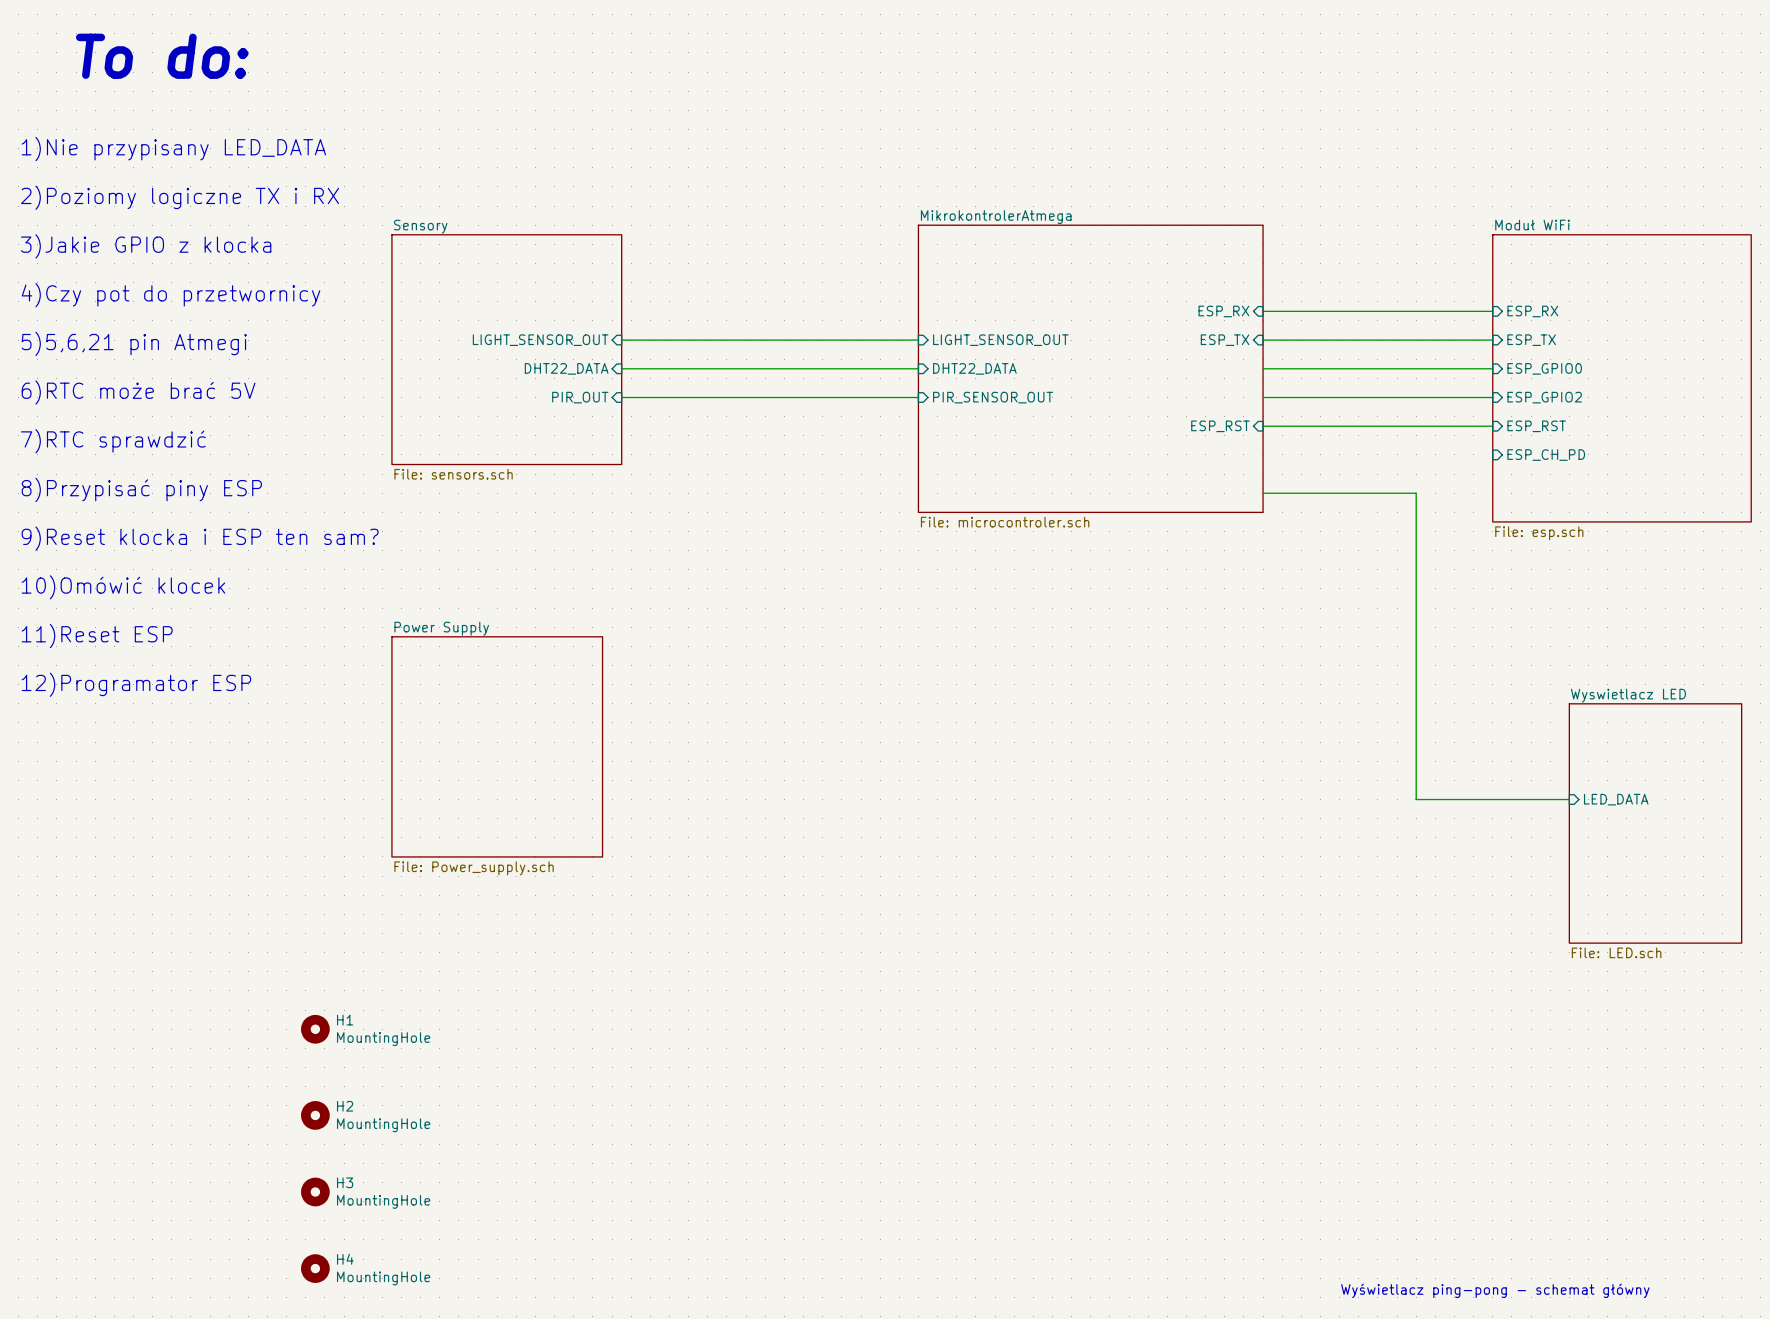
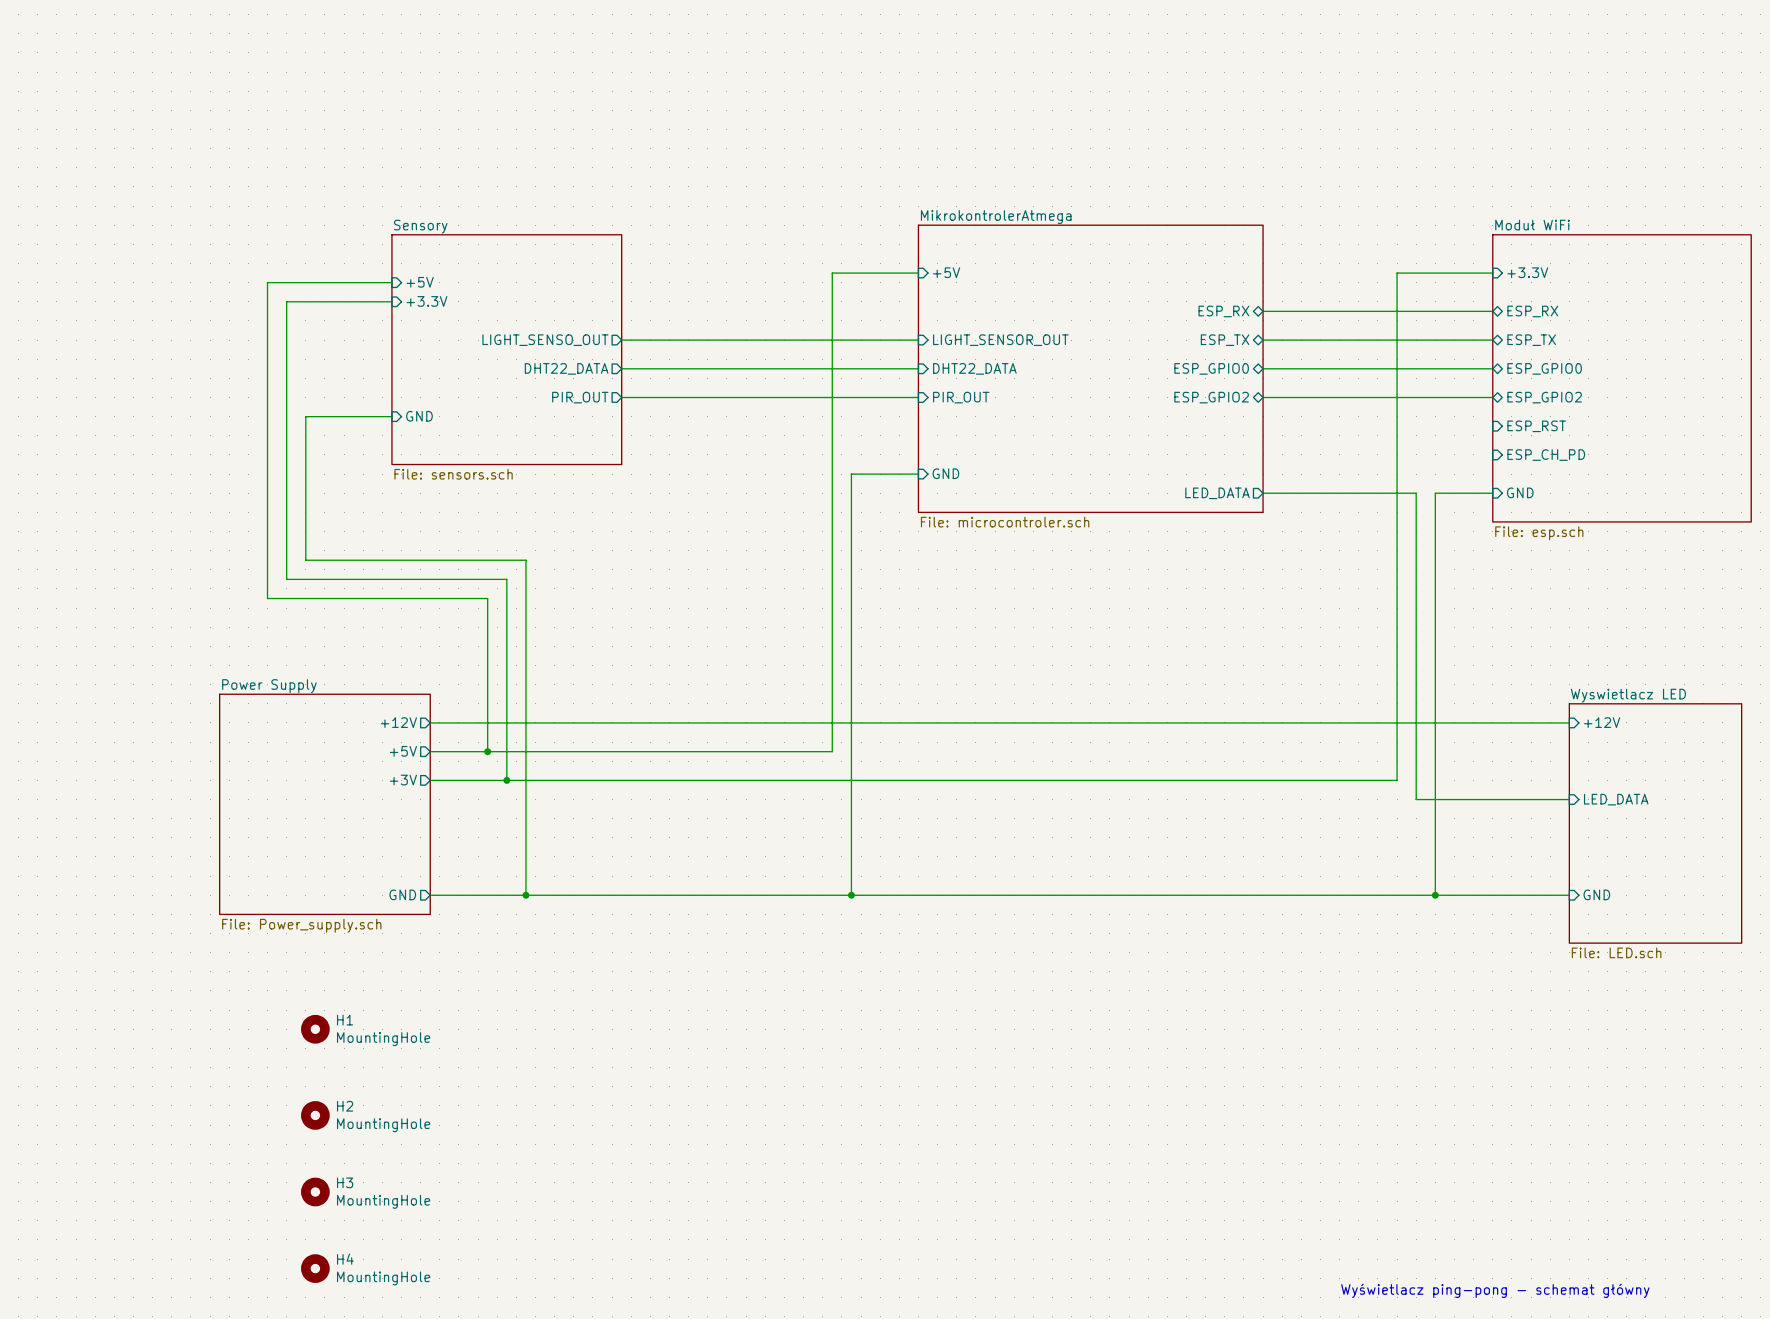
text: To do: (162, 56) -> none
text: 1)Nie przypisany LED_DATA (173, 149) -> none
text: 2)Poziomy logiczne TX i RX (179, 197) -> none
text: 3)Jakie GPIO z klocka (146, 246) -> none
sheet pin: none -> +5V (946, 272)
sheet pin: none -> +3.3V (1527, 272)
wire: none -> (918, 273) (832, 273) (832, 751) (430, 751)
wire: none -> (1492, 273) (1397, 273) (1397, 780) (430, 780)
wire: none -> (391, 282) (267, 282) (267, 598) (487, 598) (487, 751)
sheet pin: none -> +5V (420, 282)
text: 4)Czy pot do przetwornicy (170, 295) -> none
wire: none -> (391, 301) (286, 301) (286, 579) (506, 579) (506, 780)
sheet pin: none -> +3.3V (426, 301)
sheet pin shape: input (1223, 311) -> bidirectional (1223, 311)
sheet pin shape: input (1532, 311) -> bidirectional (1532, 311)
sheet pin shape: input (540, 340) -> output (545, 340)
sheet pin: LIGHT_SENSOR_OUT (540, 340) -> LIGHT_SENSO_OUT (545, 340)
sheet pin shape: input (1225, 340) -> bidirectional (1225, 340)
sheet pin shape: input (1531, 340) -> bidirectional (1531, 340)
text: 5)5,6,21 pin Atmegi (134, 343) -> none
sheet pin shape: input (566, 368) -> output (566, 368)
sheet pin: none -> ESP_GPIO0 (1211, 368)
sheet pin shape: input (1544, 368) -> bidirectional (1544, 368)
text: 6)RTC może brać 5V (138, 392) -> none
sheet pin shape: input (580, 397) -> output (580, 397)
sheet pin: PIR_SENSOR_OUT (993, 397) -> PIR_OUT (961, 397)
sheet pin: none -> ESP_GPIO2 (1211, 397)
sheet pin shape: input (1544, 397) -> bidirectional (1544, 397)
wire: none -> (391, 416) (305, 416) (305, 560) (525, 560) (525, 895)
sheet pin: none -> GND (419, 416)
sheet pin: ESP_RST (1220, 426) -> none
wire: (1263, 426) (1492, 426) -> none
text: 7)RTC sprawdzić (113, 441) -> none
sheet pin: none -> GND (945, 473)
wire: none -> (918, 474) (851, 474) (851, 895)
text: 8)Przypisać piny ESP (141, 489) -> none
sheet pin: none -> GND (1520, 492)
sheet pin: none -> LED_DATA (1217, 493)
wire: none -> (1492, 493) (1435, 493) (1435, 895)
text: 9)Reset klocka i ESP ten sam? (200, 538) -> none
text: 10)Omówić klocek (123, 587) -> none
text: 11)Reset ESP (97, 636) -> none
text: 12)Programator ESP (136, 684) -> none
sheet pin: none -> +12V (398, 722)
wire: none -> (430, 722) (1569, 722)
sheet pin: none -> +12V (1602, 722)
sheet Power Supply position: (497, 746) -> (324, 804)
sheet pin: none -> +5V (403, 751)
junction: none -> (487, 751)
sheet pin: none -> +3V (403, 780)
junction: none -> (506, 780)
sheet pin: none -> GND (402, 894)
sheet pin: none -> GND (1596, 894)
wire: none -> (430, 895) (1569, 895)
junction: none -> (525, 895)
junction: none -> (851, 895)
junction: none -> (1435, 895)

